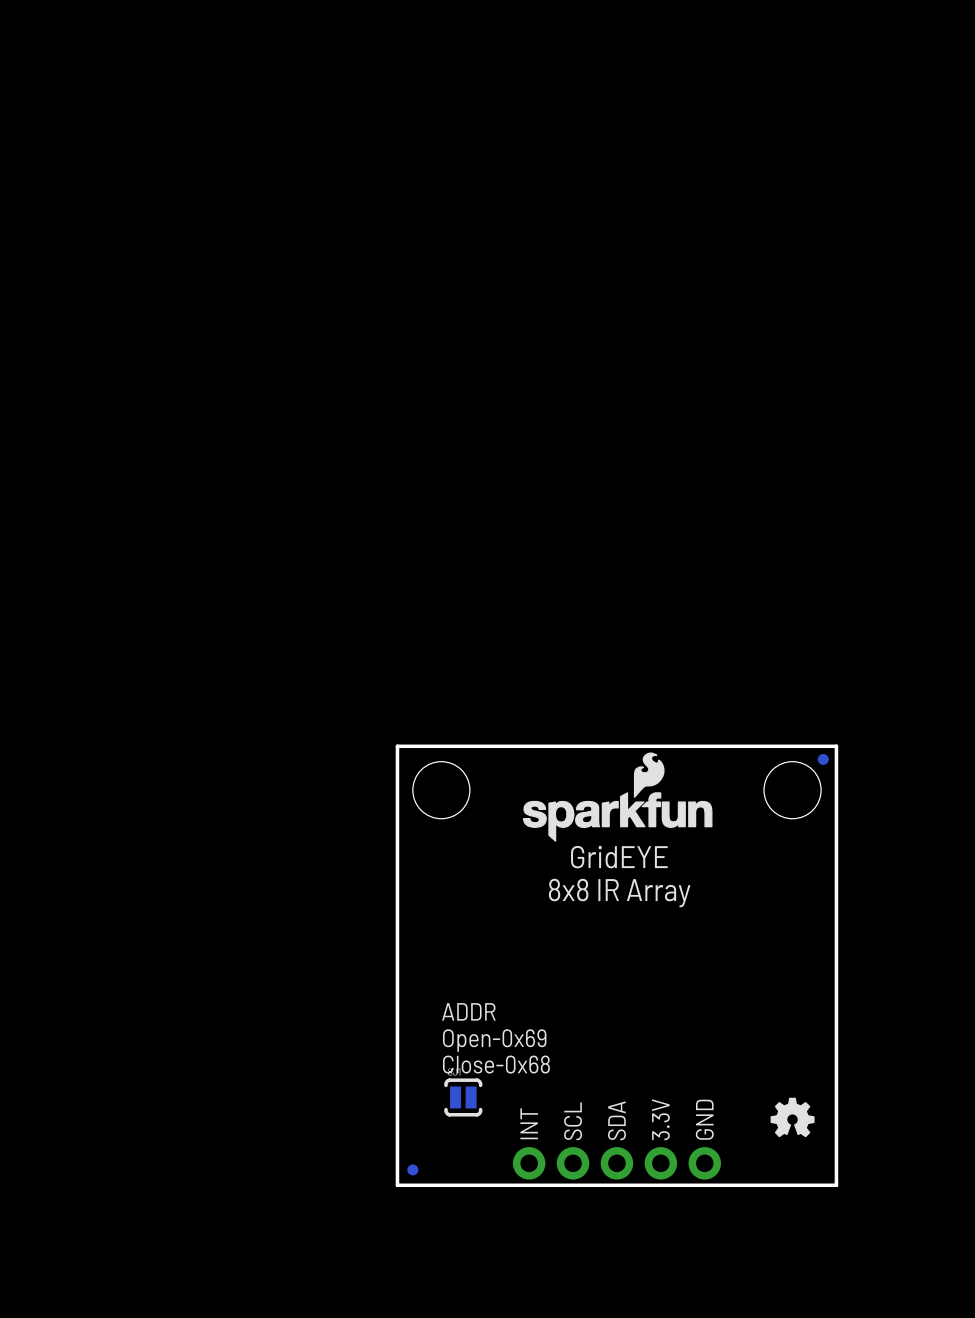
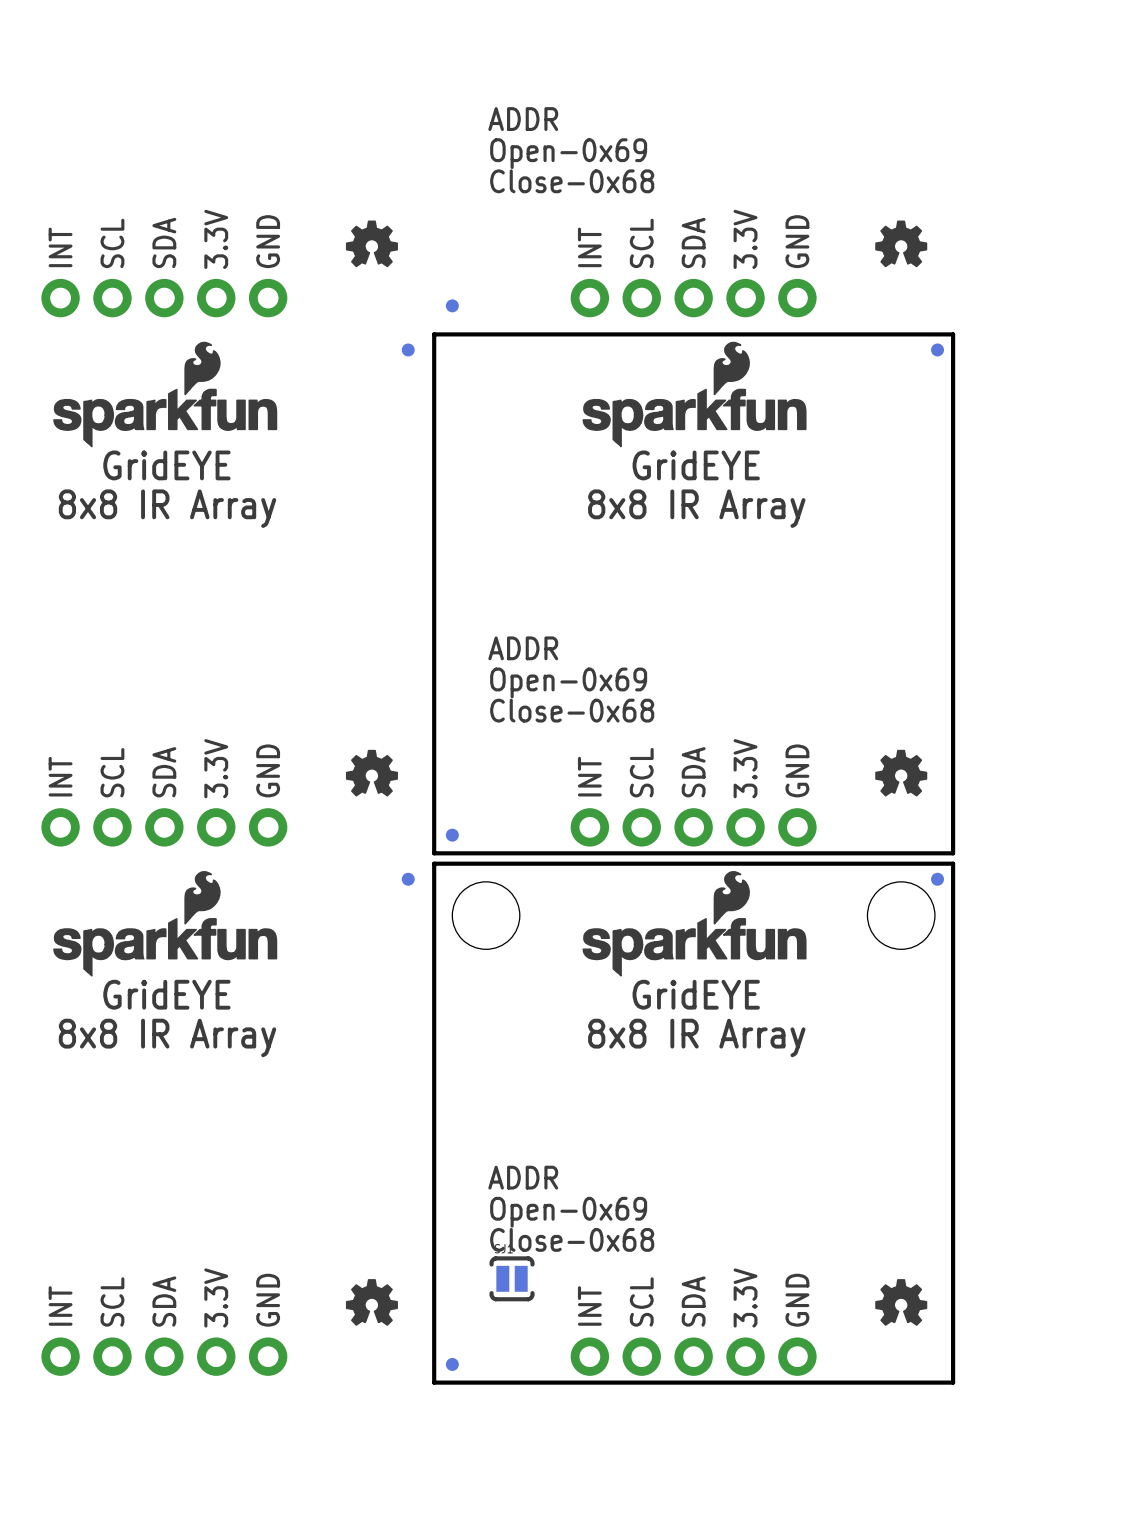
text: none -> ADDR (523, 119)
text: none -> Open-0x69 (568, 153)
text: none -> Close-0x68 (572, 181)
drawing: none -> [345, 220, 398, 268]
drawing: none -> [875, 220, 928, 268]
text: none -> 3.3V (216, 239)
text: none -> GND (268, 241)
text: none -> 3.3V (745, 239)
text: none -> GND (797, 241)
text: none -> SCL (112, 243)
text: none -> SDA (164, 242)
text: none -> SCL (641, 243)
text: none -> SDA (693, 242)
text: none -> INT (60, 247)
text: none -> INT (589, 247)
part: none -> (60, 298)
part: none -> (190, 298)
part: none -> (589, 298)
part: none -> (719, 298)
part: none -> (452, 305)
board edge: none -> (953, 334) (953, 853) (434, 853) (434, 334) (953, 334)
drawing: none -> [53, 341, 278, 448]
drawing: none -> [582, 341, 807, 448]
part: none -> (408, 349)
part: none -> (937, 349)
text: none -> GridEYE (166, 465)
text: none -> GridEYE (696, 465)
text: none -> 8x8 IR Array (167, 508)
text: none -> 8x8 IR Array (696, 508)
text: none -> ADDR (523, 648)
text: none -> Open-0x69 (568, 682)
text: none -> Close-0x68 (572, 710)
drawing: none -> [345, 749, 398, 797]
drawing: none -> [875, 749, 928, 797]
text: none -> GND (268, 770)
text: none -> GND (797, 770)
text: none -> 3.3V (216, 768)
text: none -> 3.3V (745, 768)
text: none -> SCL (112, 772)
text: none -> SDA (164, 772)
text: none -> SCL (641, 772)
text: none -> SDA (693, 772)
text: none -> INT (60, 776)
text: none -> INT (589, 776)
part: none -> (60, 827)
part: none -> (190, 827)
part: none -> (589, 827)
part: none -> (719, 827)
part: none -> (452, 835)
drawing: none -> [53, 871, 278, 977]
part: none -> (408, 879)
text: none -> GridEYE (166, 994)
text: none -> 8x8 IR Array (167, 1037)
drawing: none -> [345, 1279, 398, 1326]
text: none -> 3.3V (216, 1297)
text: none -> GND (268, 1300)
text: none -> SDA (164, 1301)
text: none -> SCL (112, 1301)
text: none -> INT (60, 1305)
part: none -> (60, 1356)
part: none -> (190, 1356)

